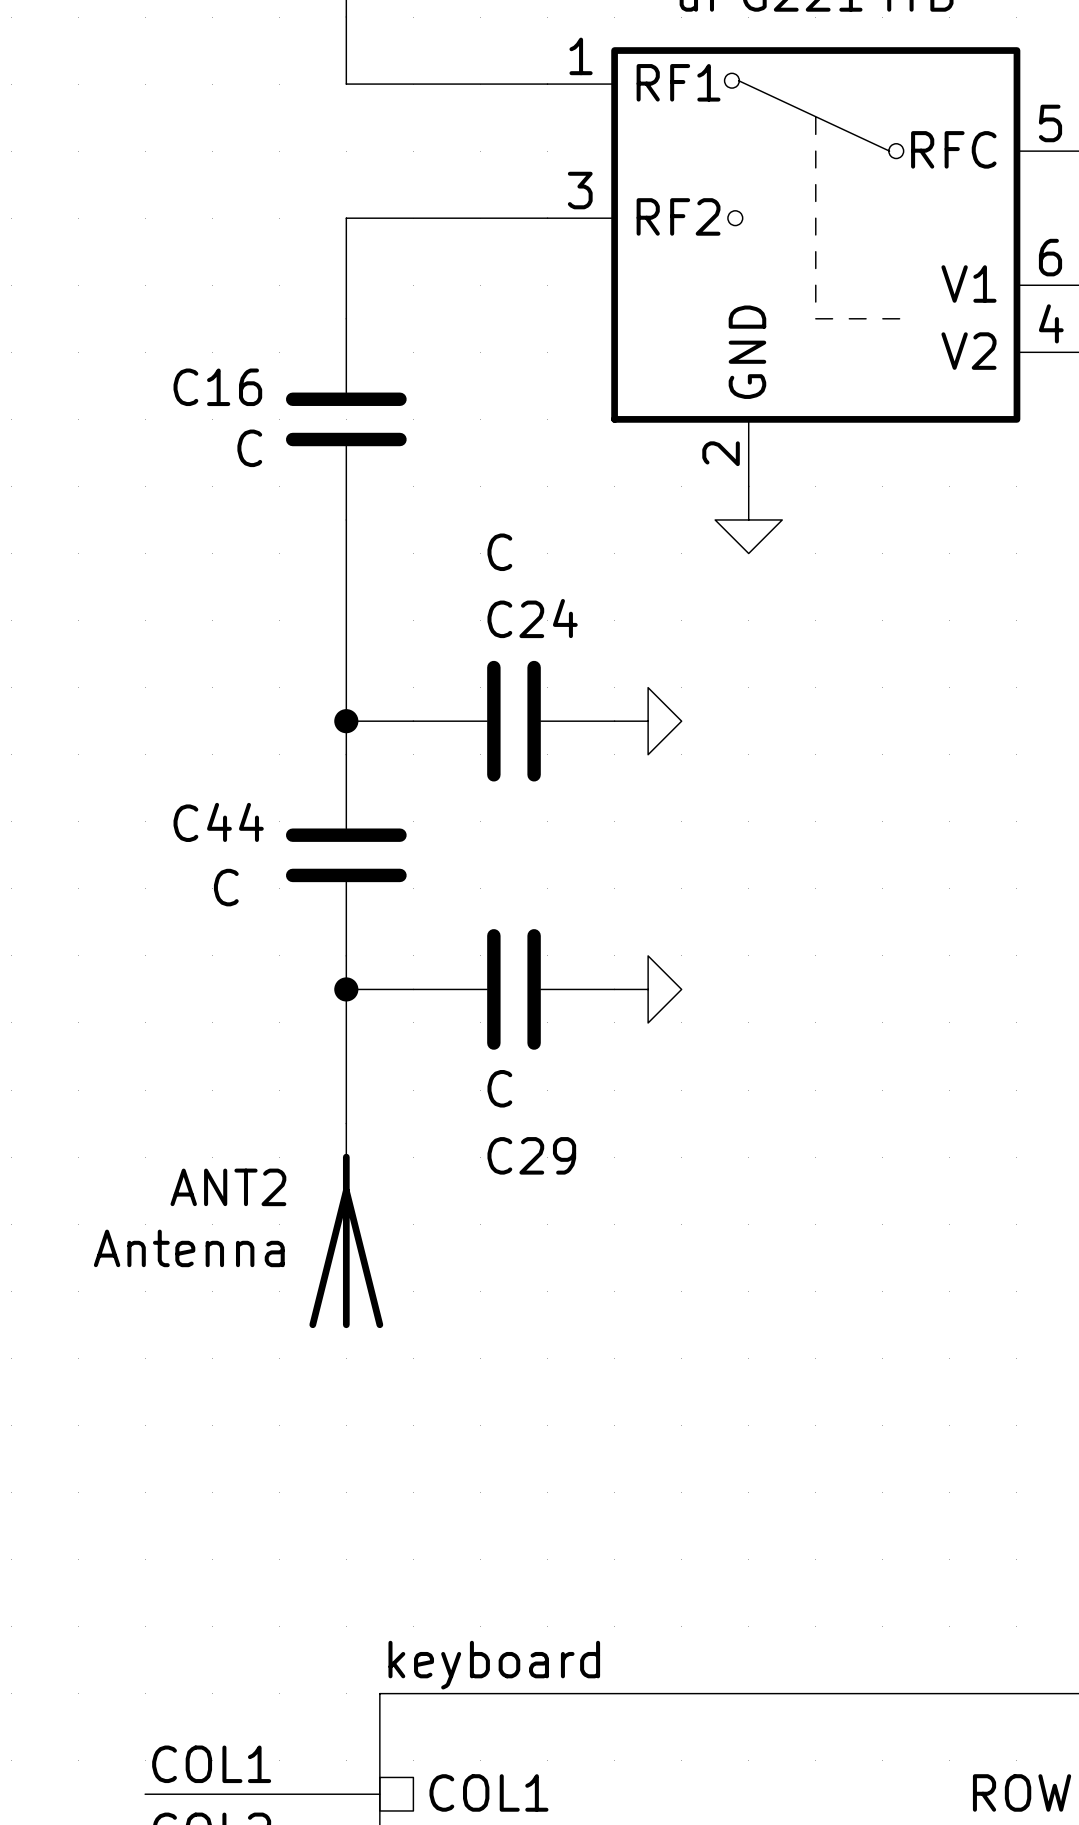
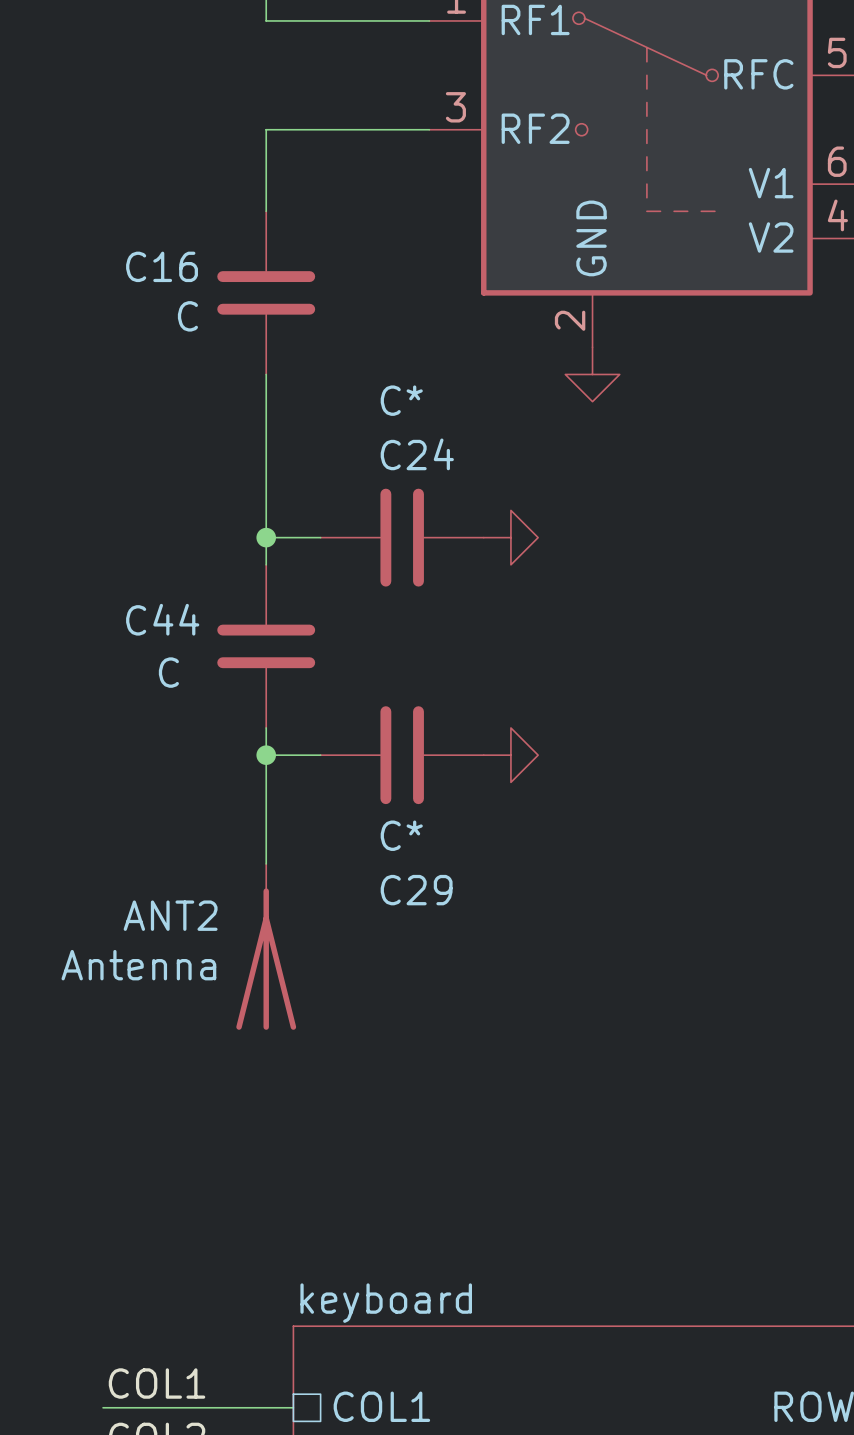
C24 value: C (499, 552) -> C* (401, 400)
C29 value: C (499, 1088) -> C* (401, 835)

